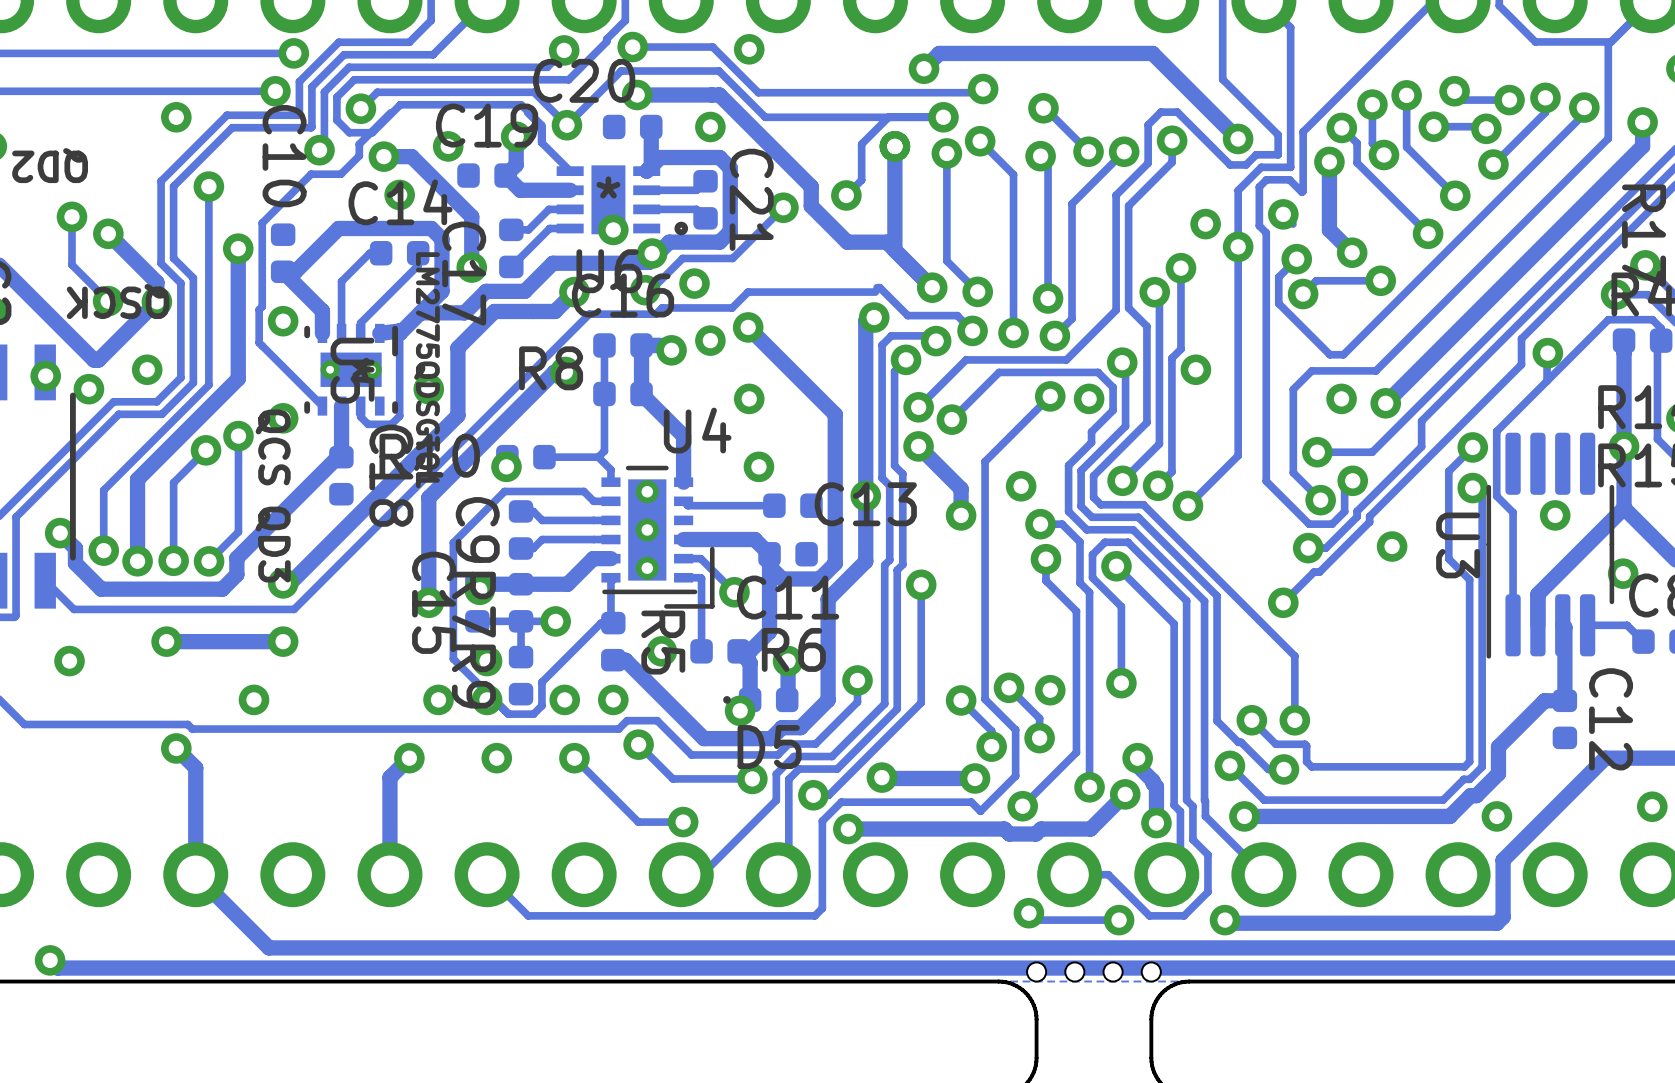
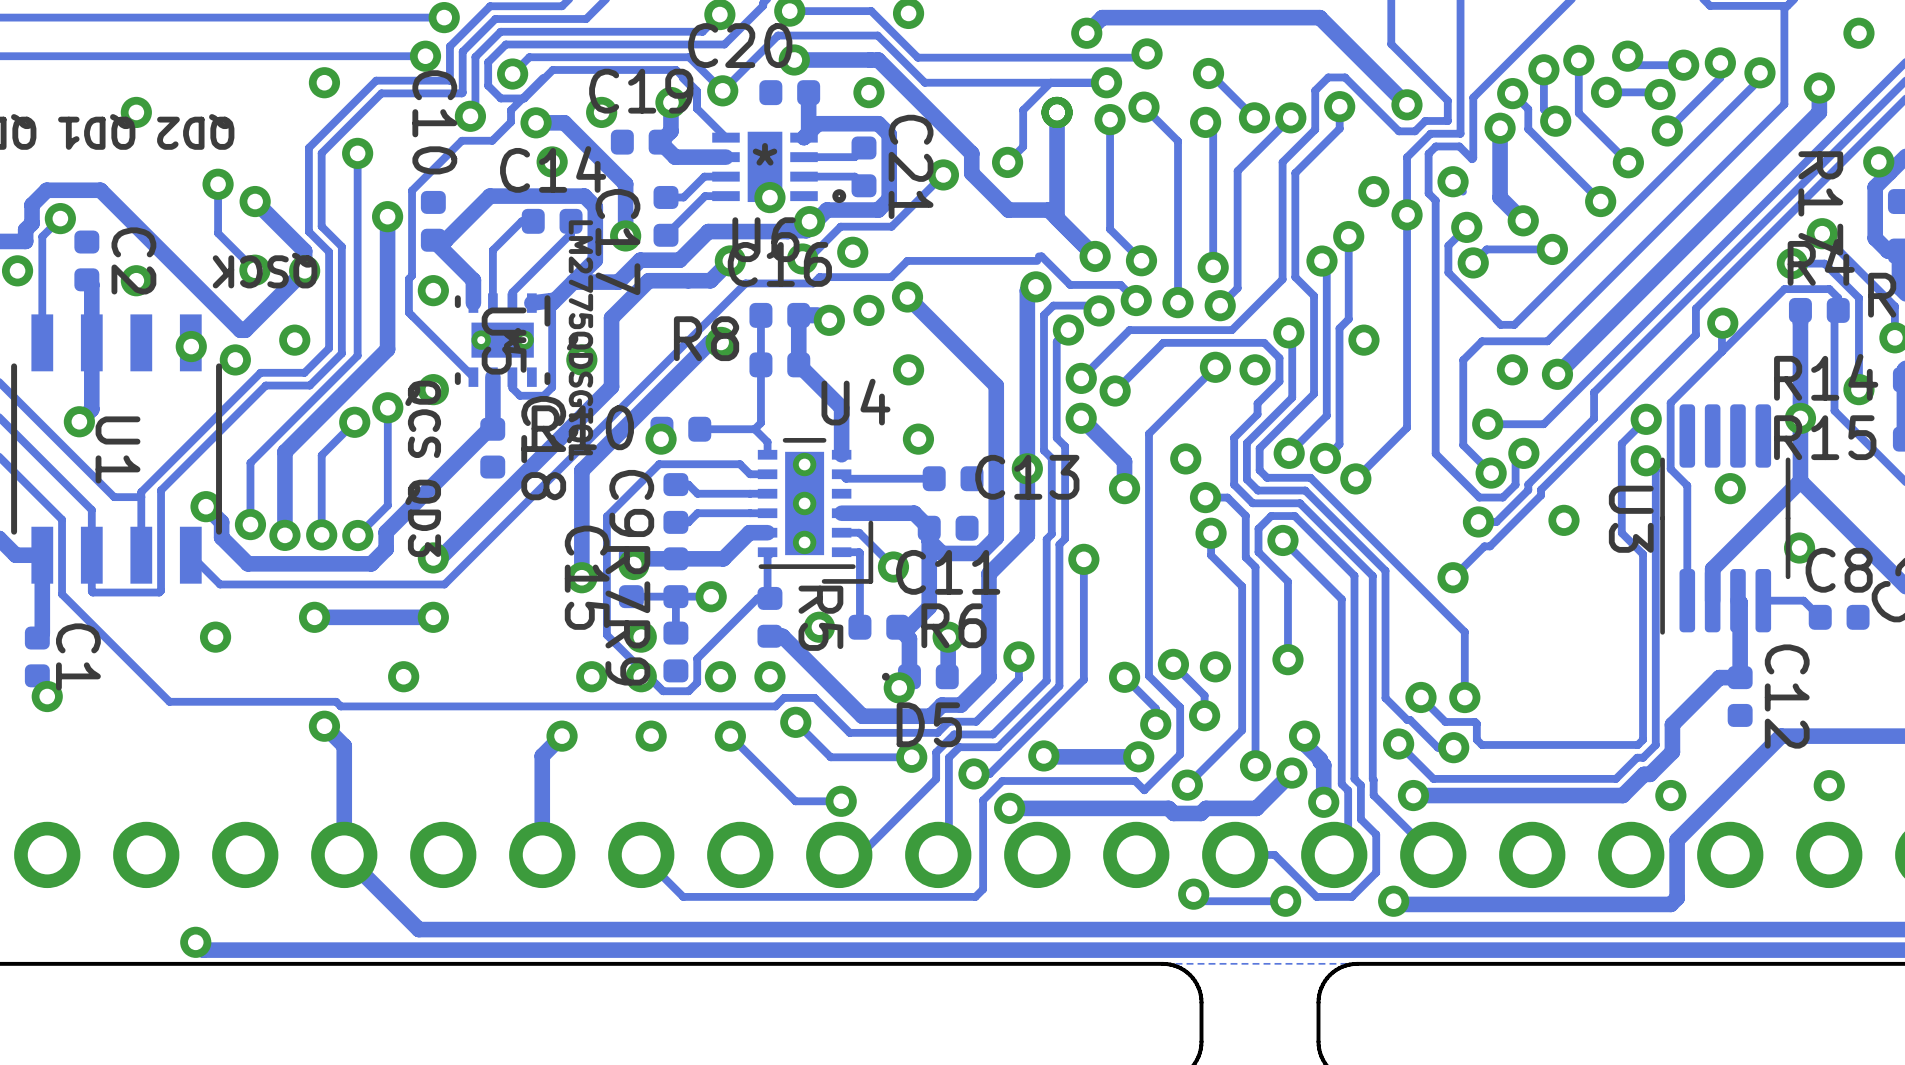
part: (1036, 971) -> none
part: (1074, 971) -> none
part: (1113, 971) -> none
part: (1151, 971) -> none

